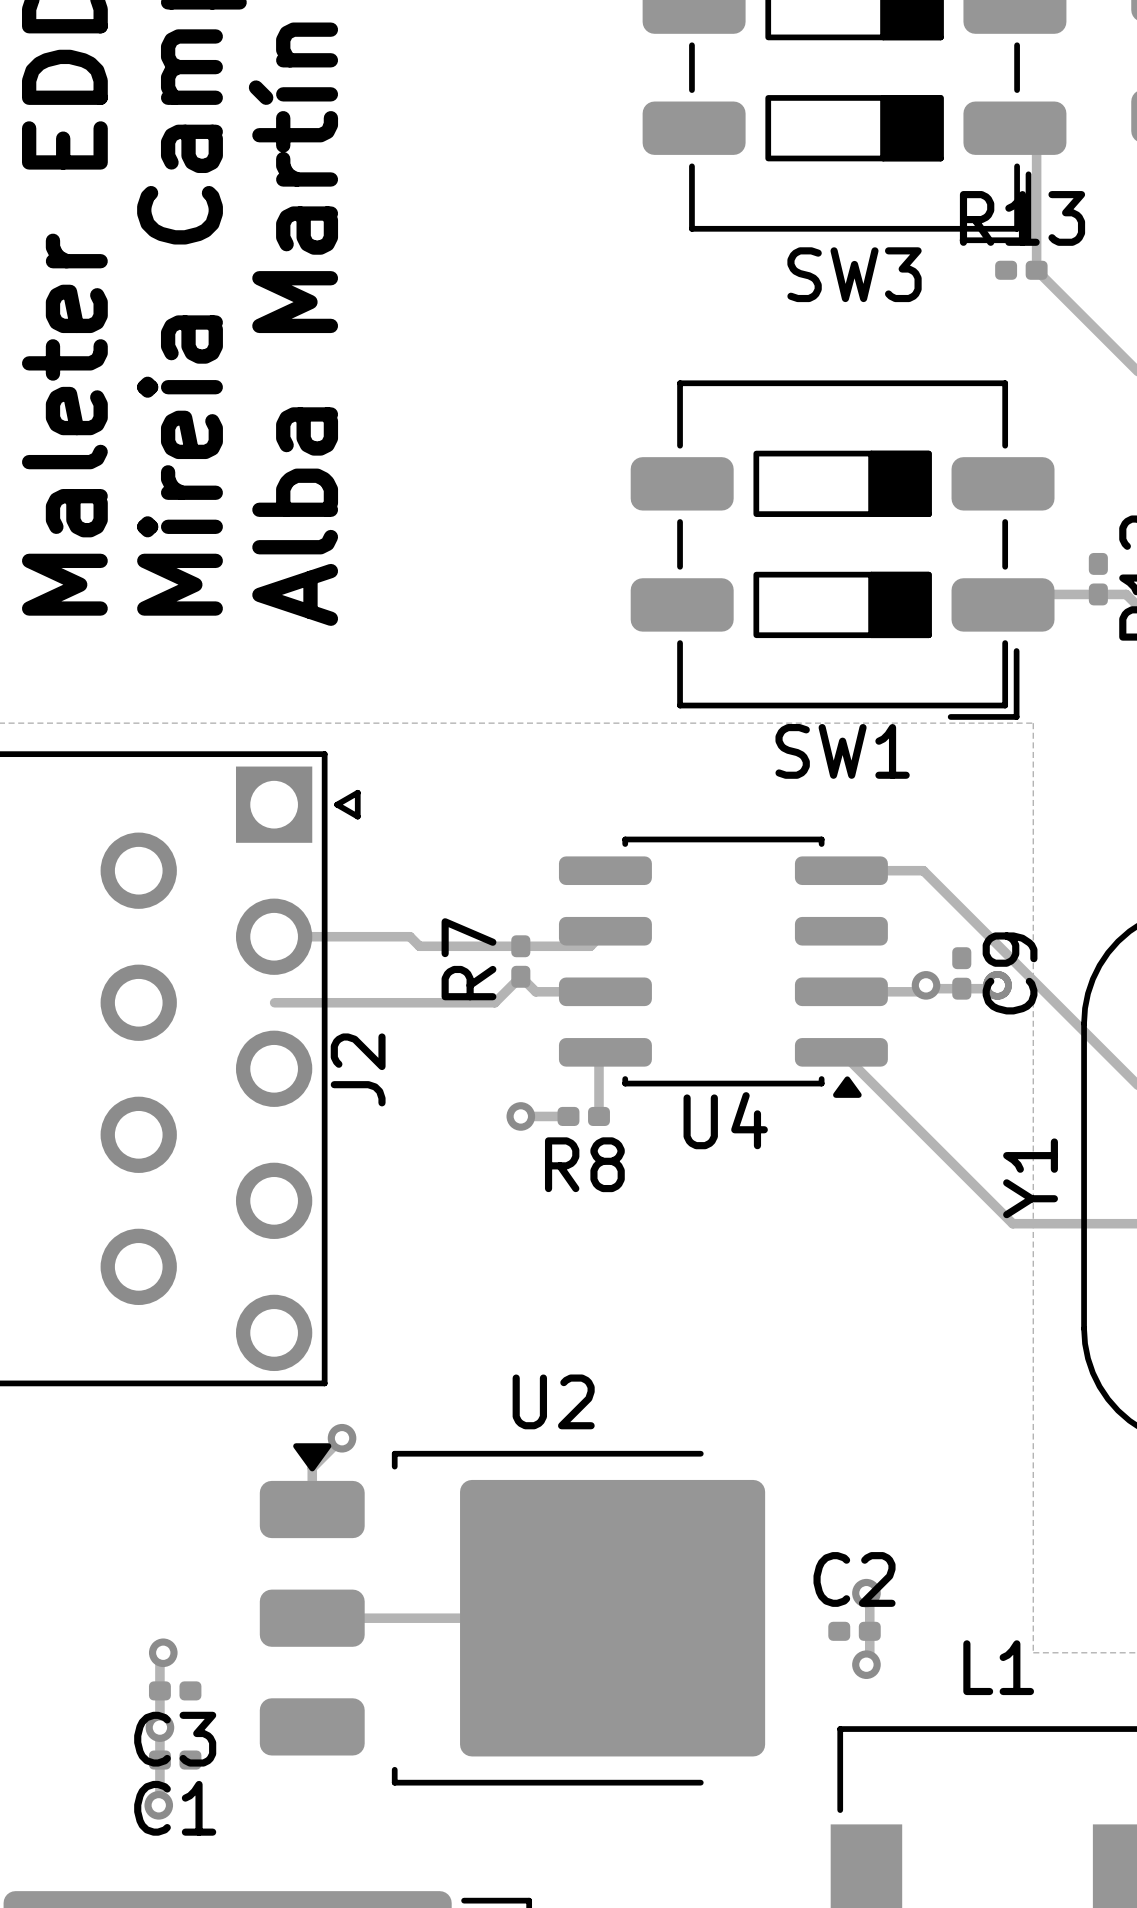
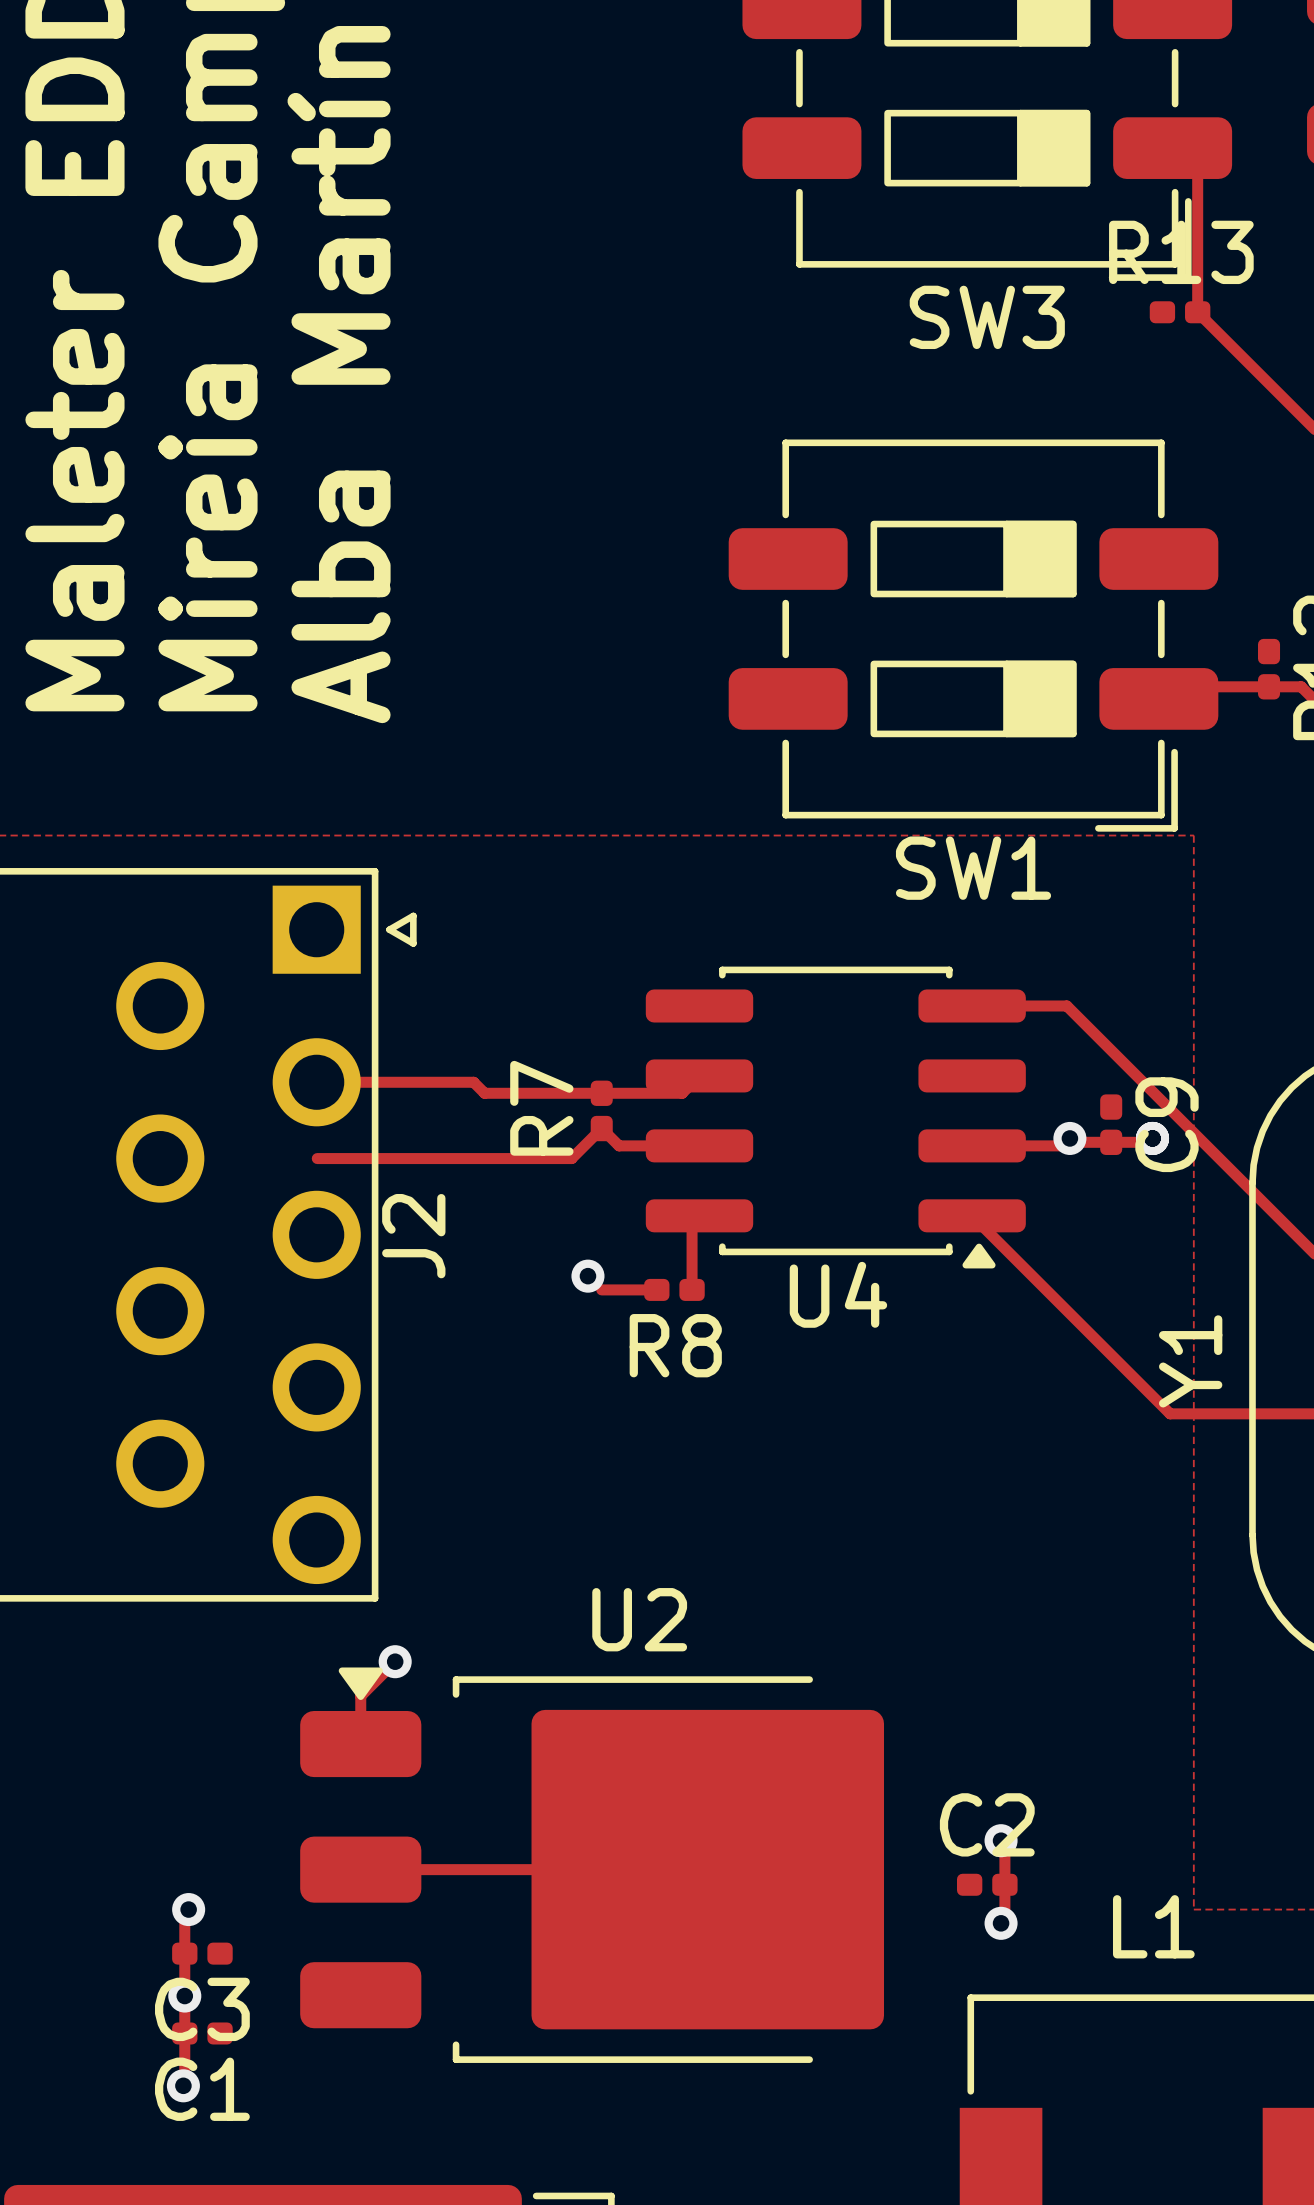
via position: (520, 1116) -> (587, 1276)

